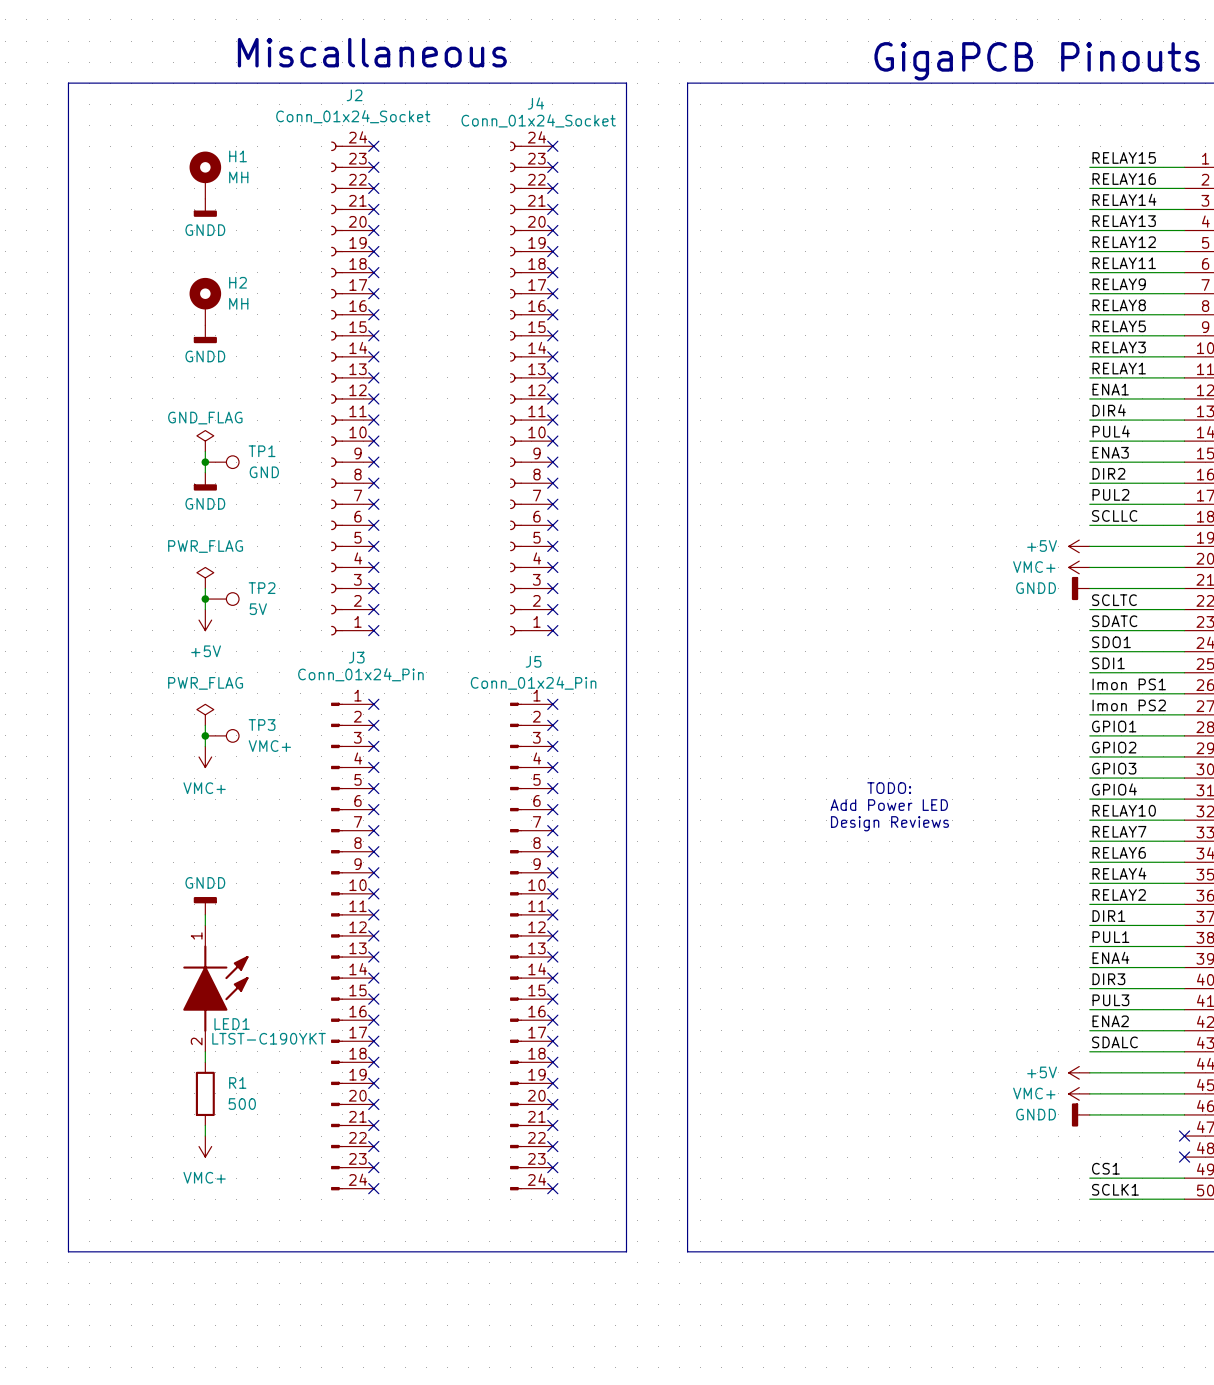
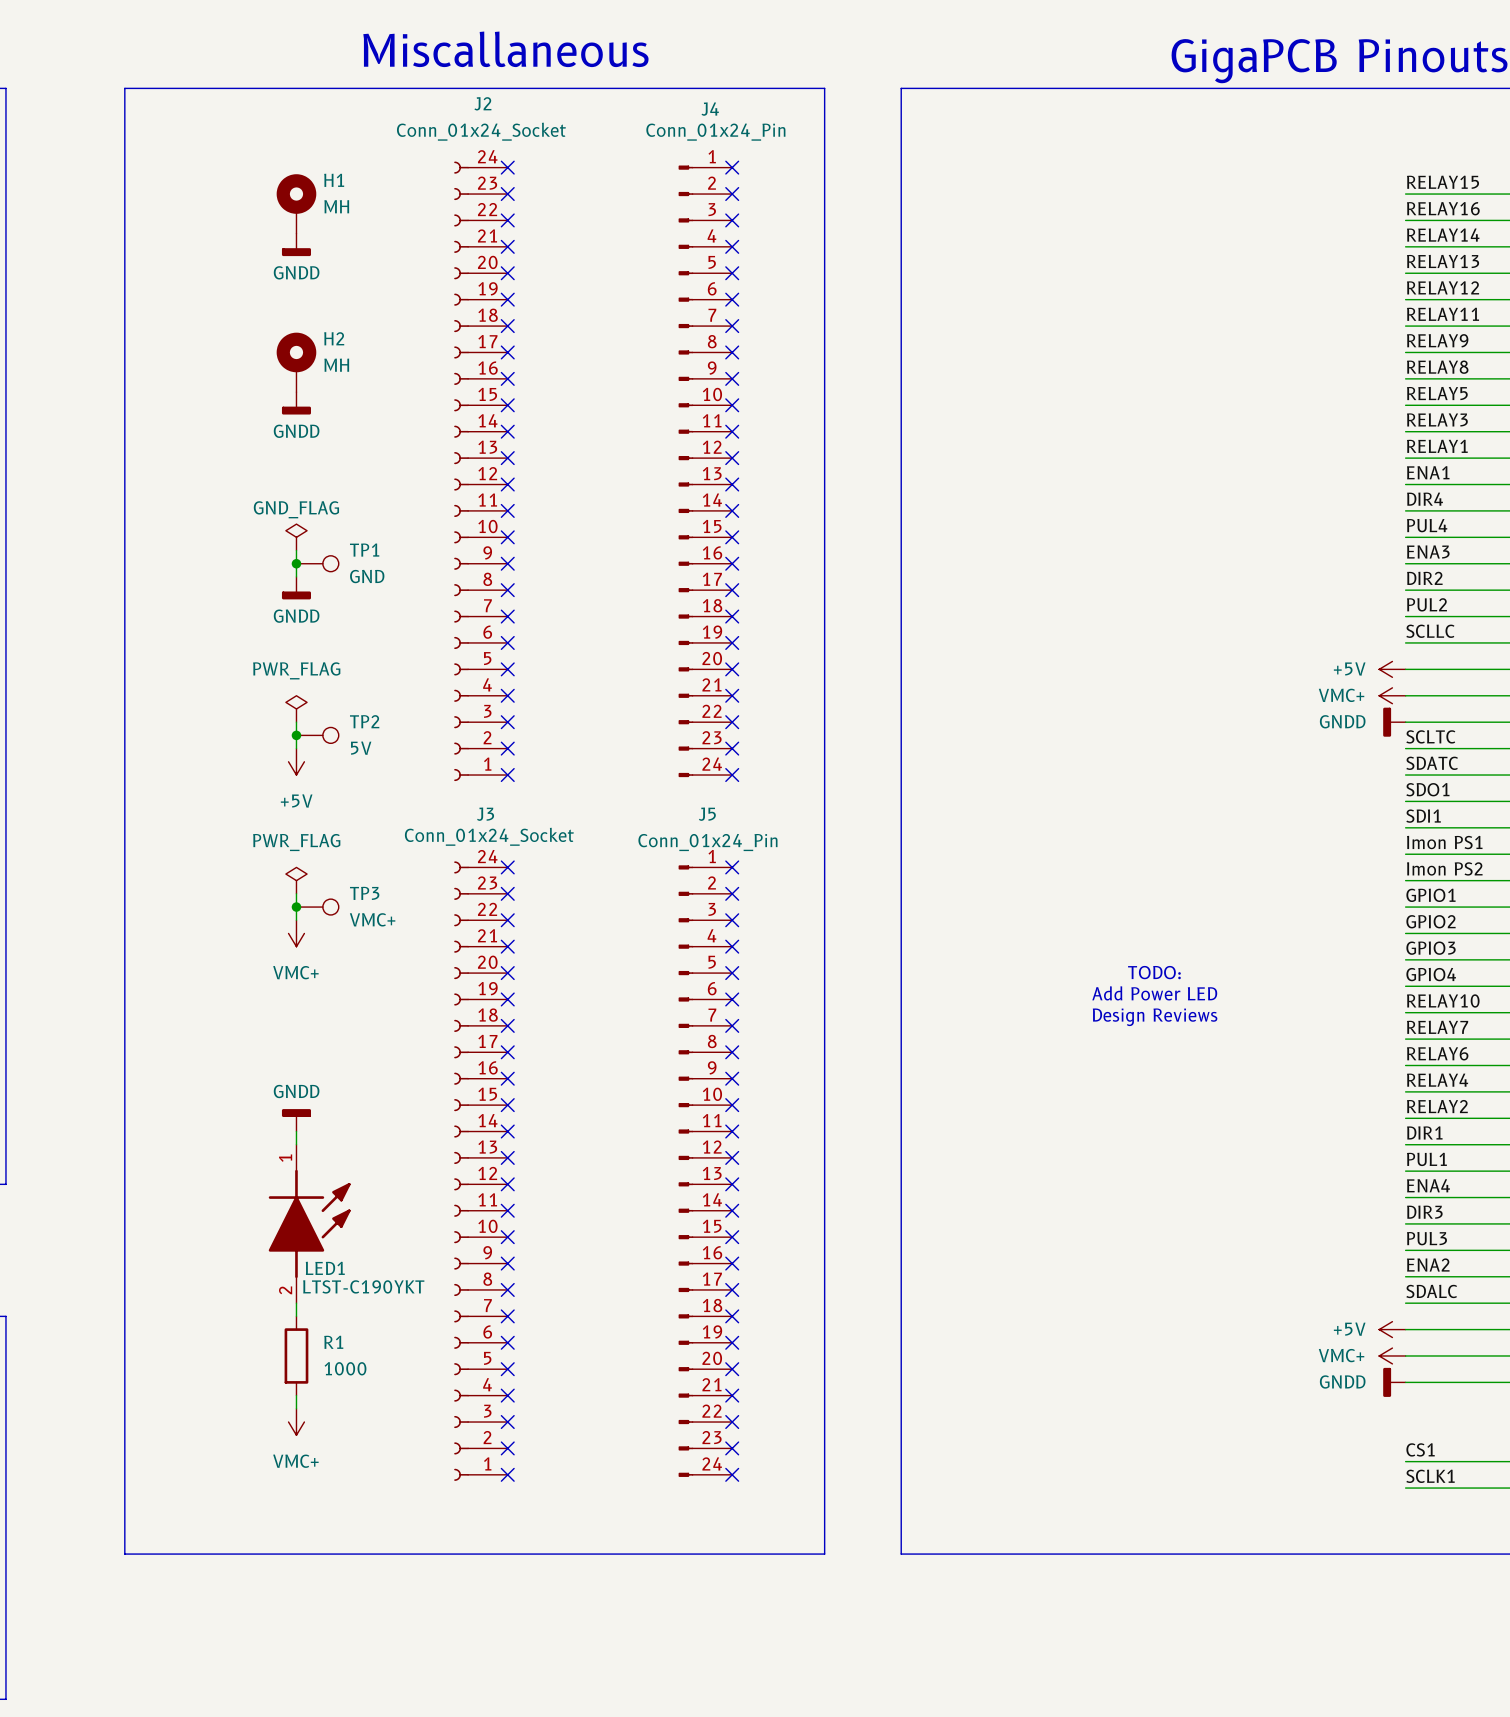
J4 value: Conn_01x24_Socket (538, 120) -> Conn_01x24_Pin (715, 132)
J4 symbol: [510, 141, 553, 636] -> [678, 165, 733, 778]
J3 value: Conn_01x24_Pin (360, 674) -> Conn_01x24_Socket (489, 836)
J3 symbol: [331, 702, 374, 1191] -> [454, 861, 508, 1481]
R1 value: 500 (242, 1104) -> 1000 (345, 1368)

